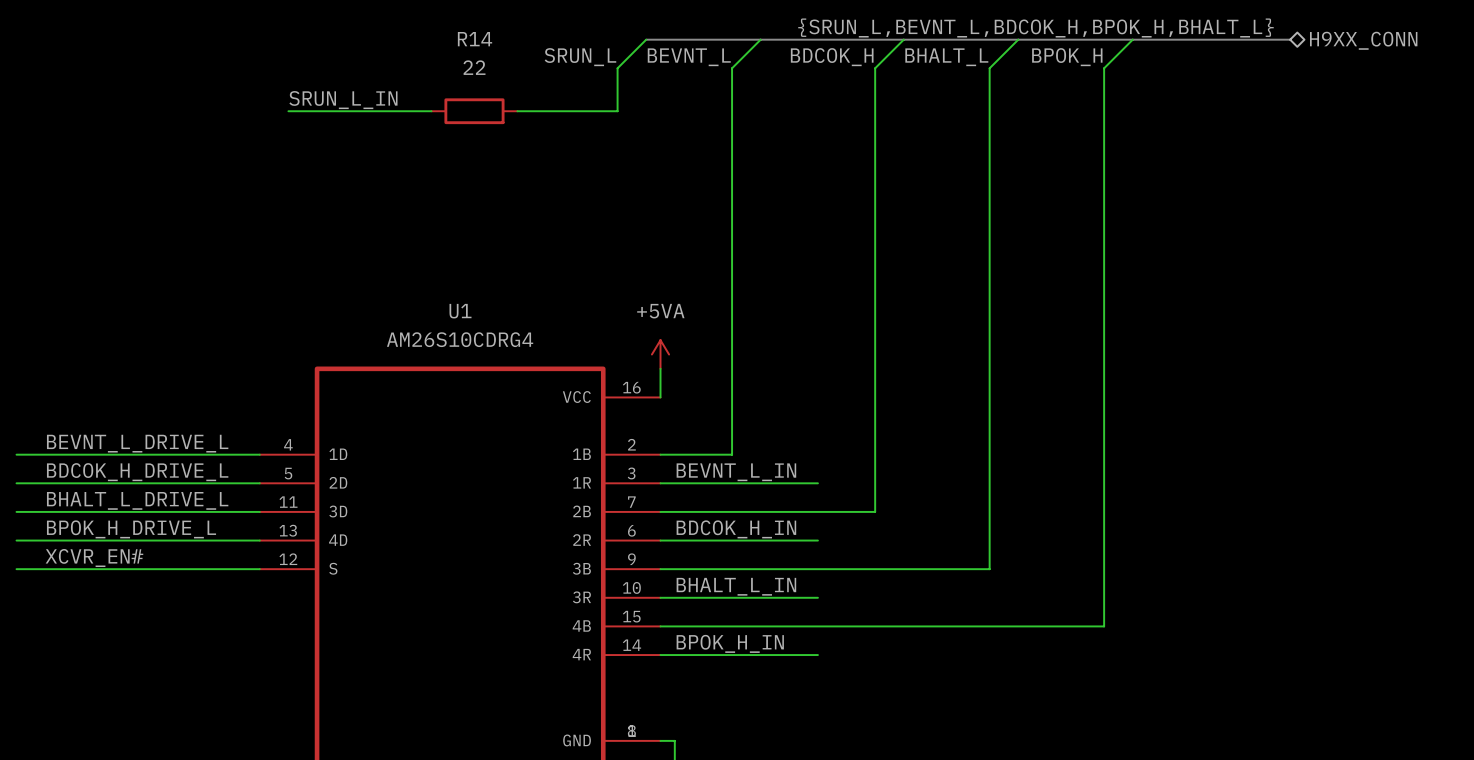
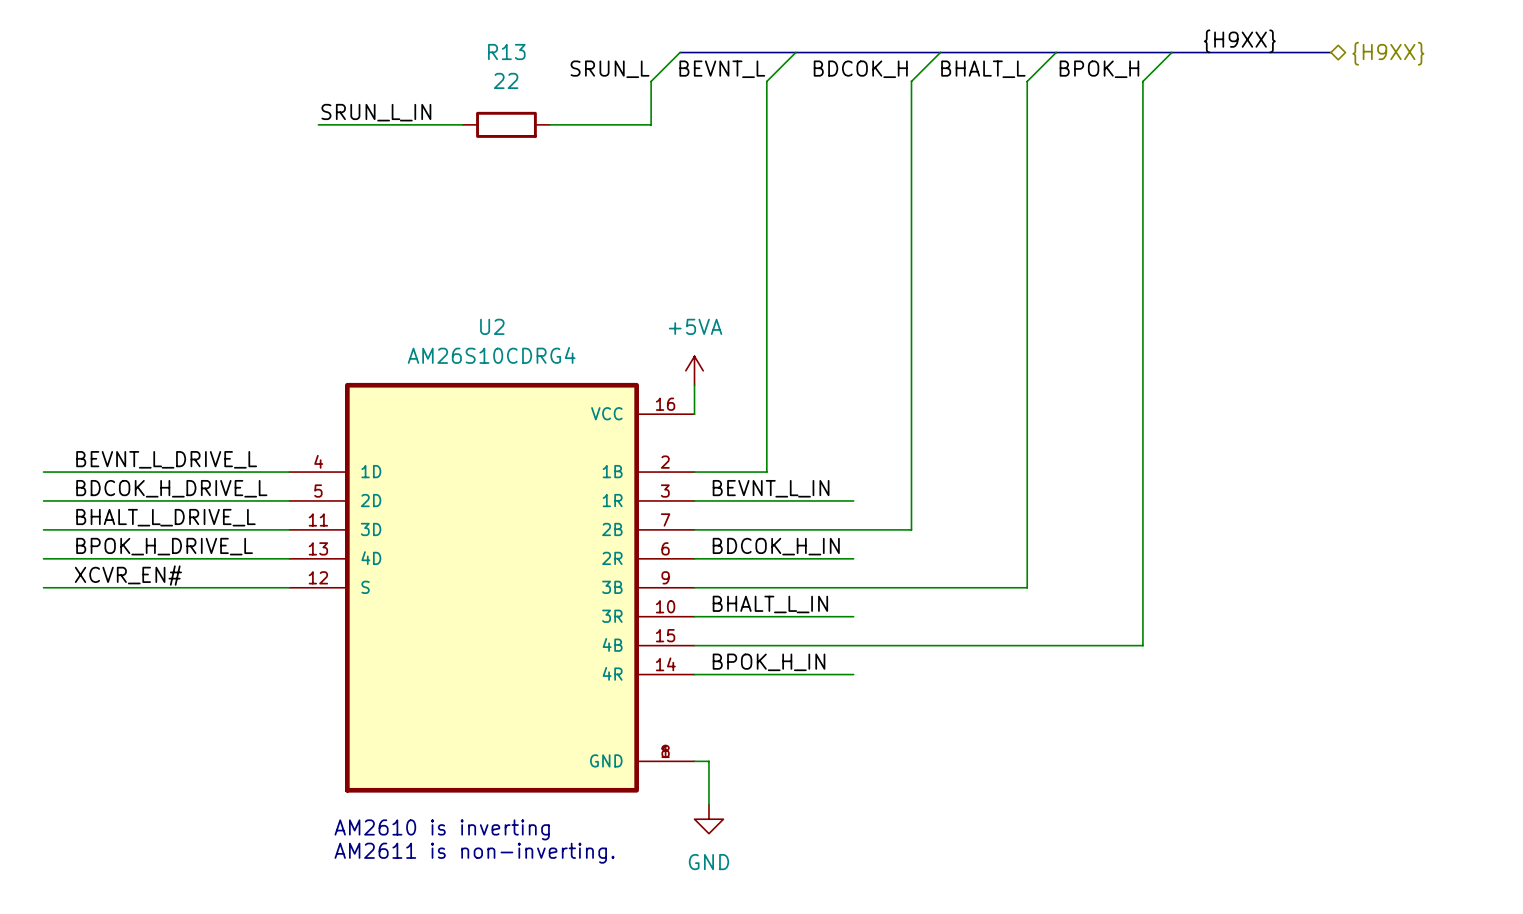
label: none -> {H9XX} (1239, 41)
label: {SRUN_L,BEVNT_L,BDCOK_H,BPOK_H,BHALT_L} (1035, 28) -> none
R14 name: R14 (475, 39) -> R13 (506, 52)
hierarchical label: H9XX_CONN (1363, 40) -> {H9XX} (1388, 53)
U1 name: U1 (460, 311) -> U2 (492, 326)

